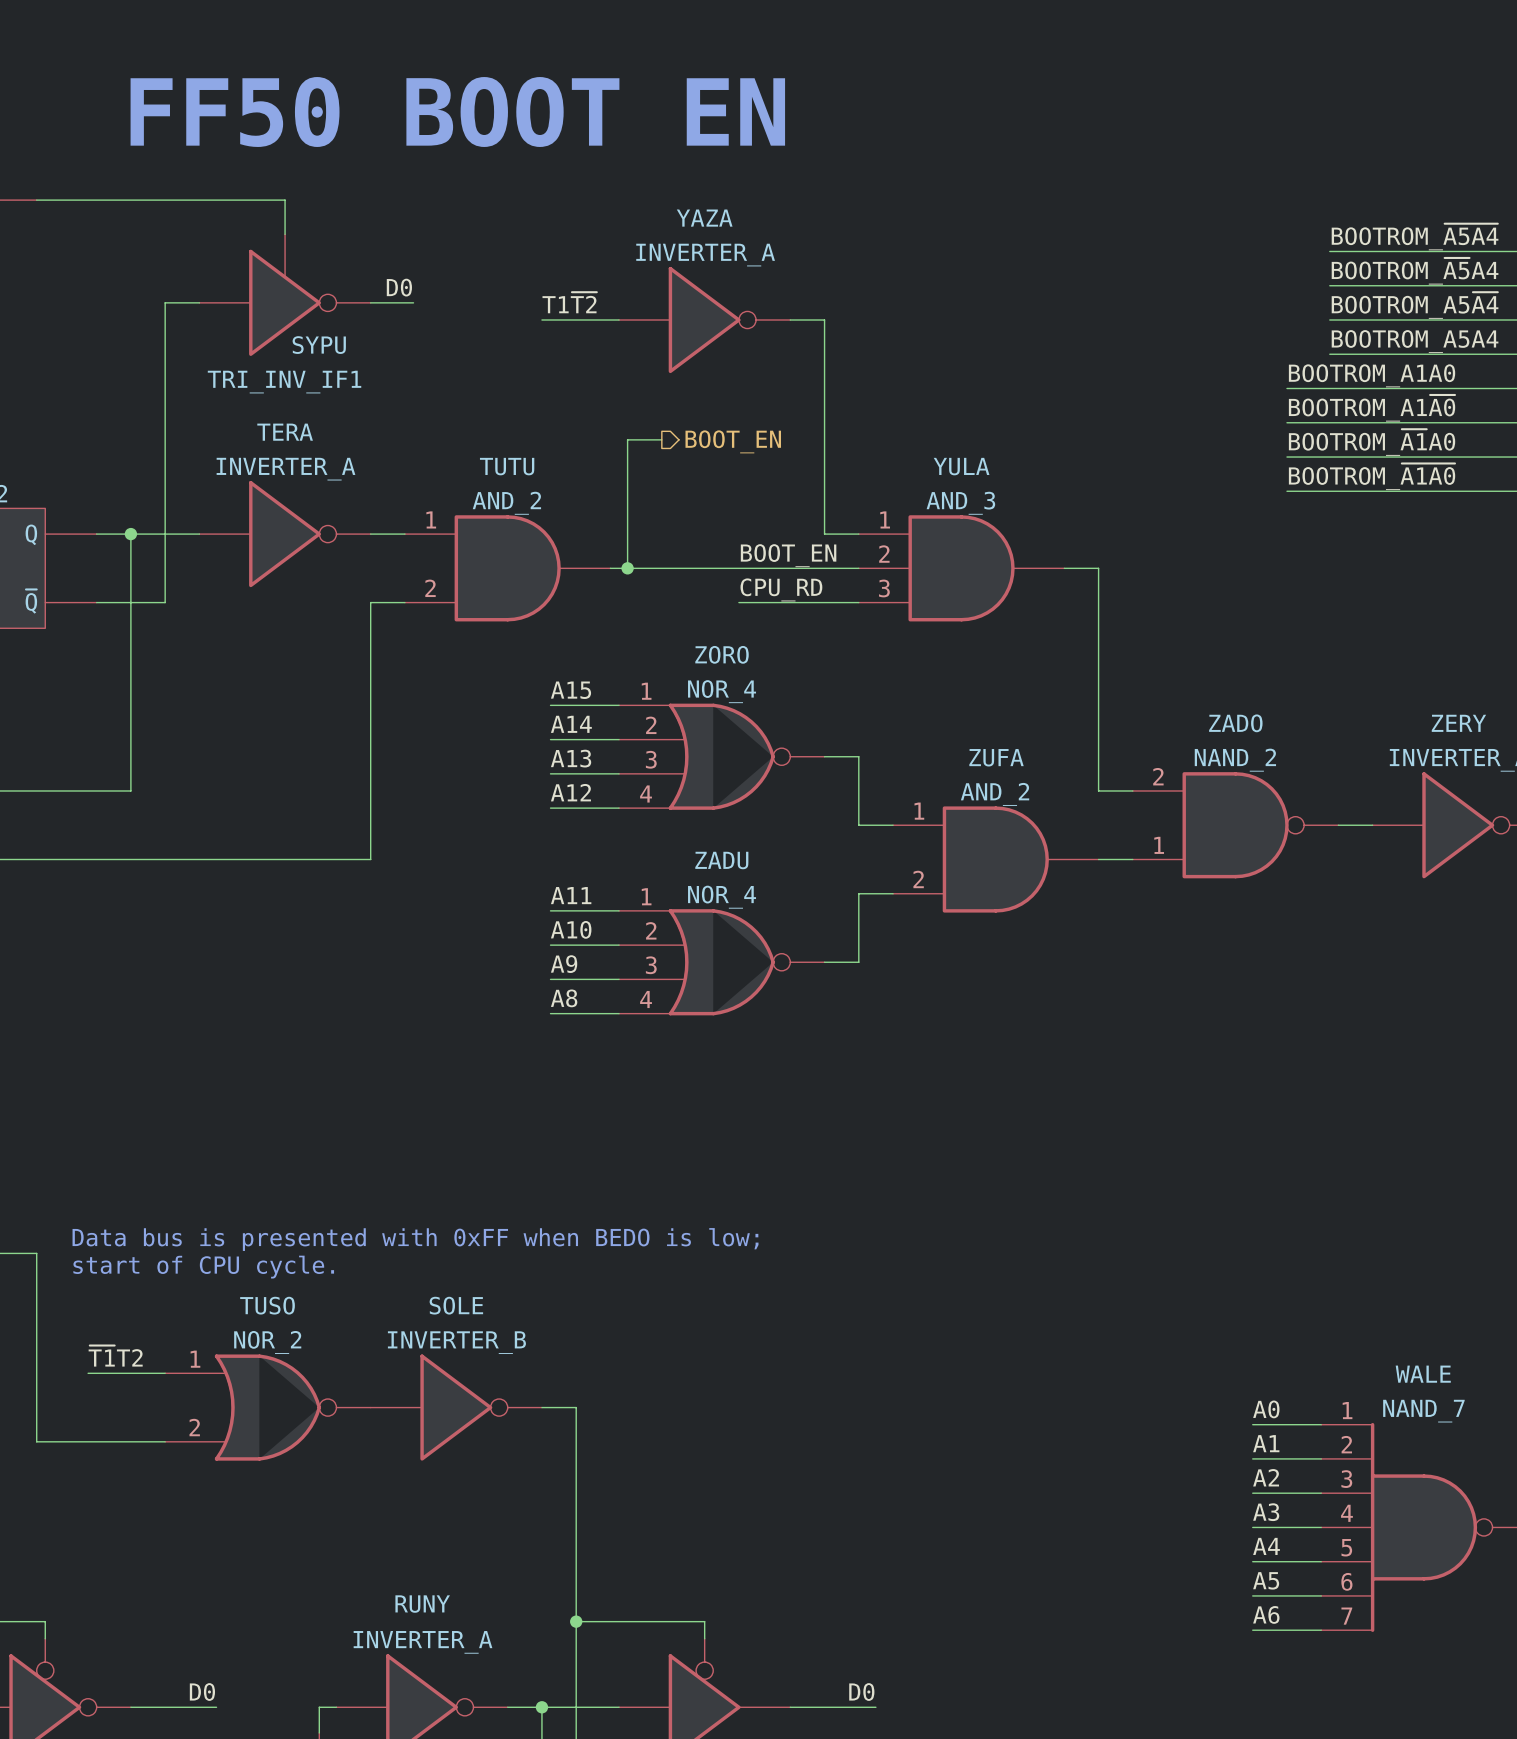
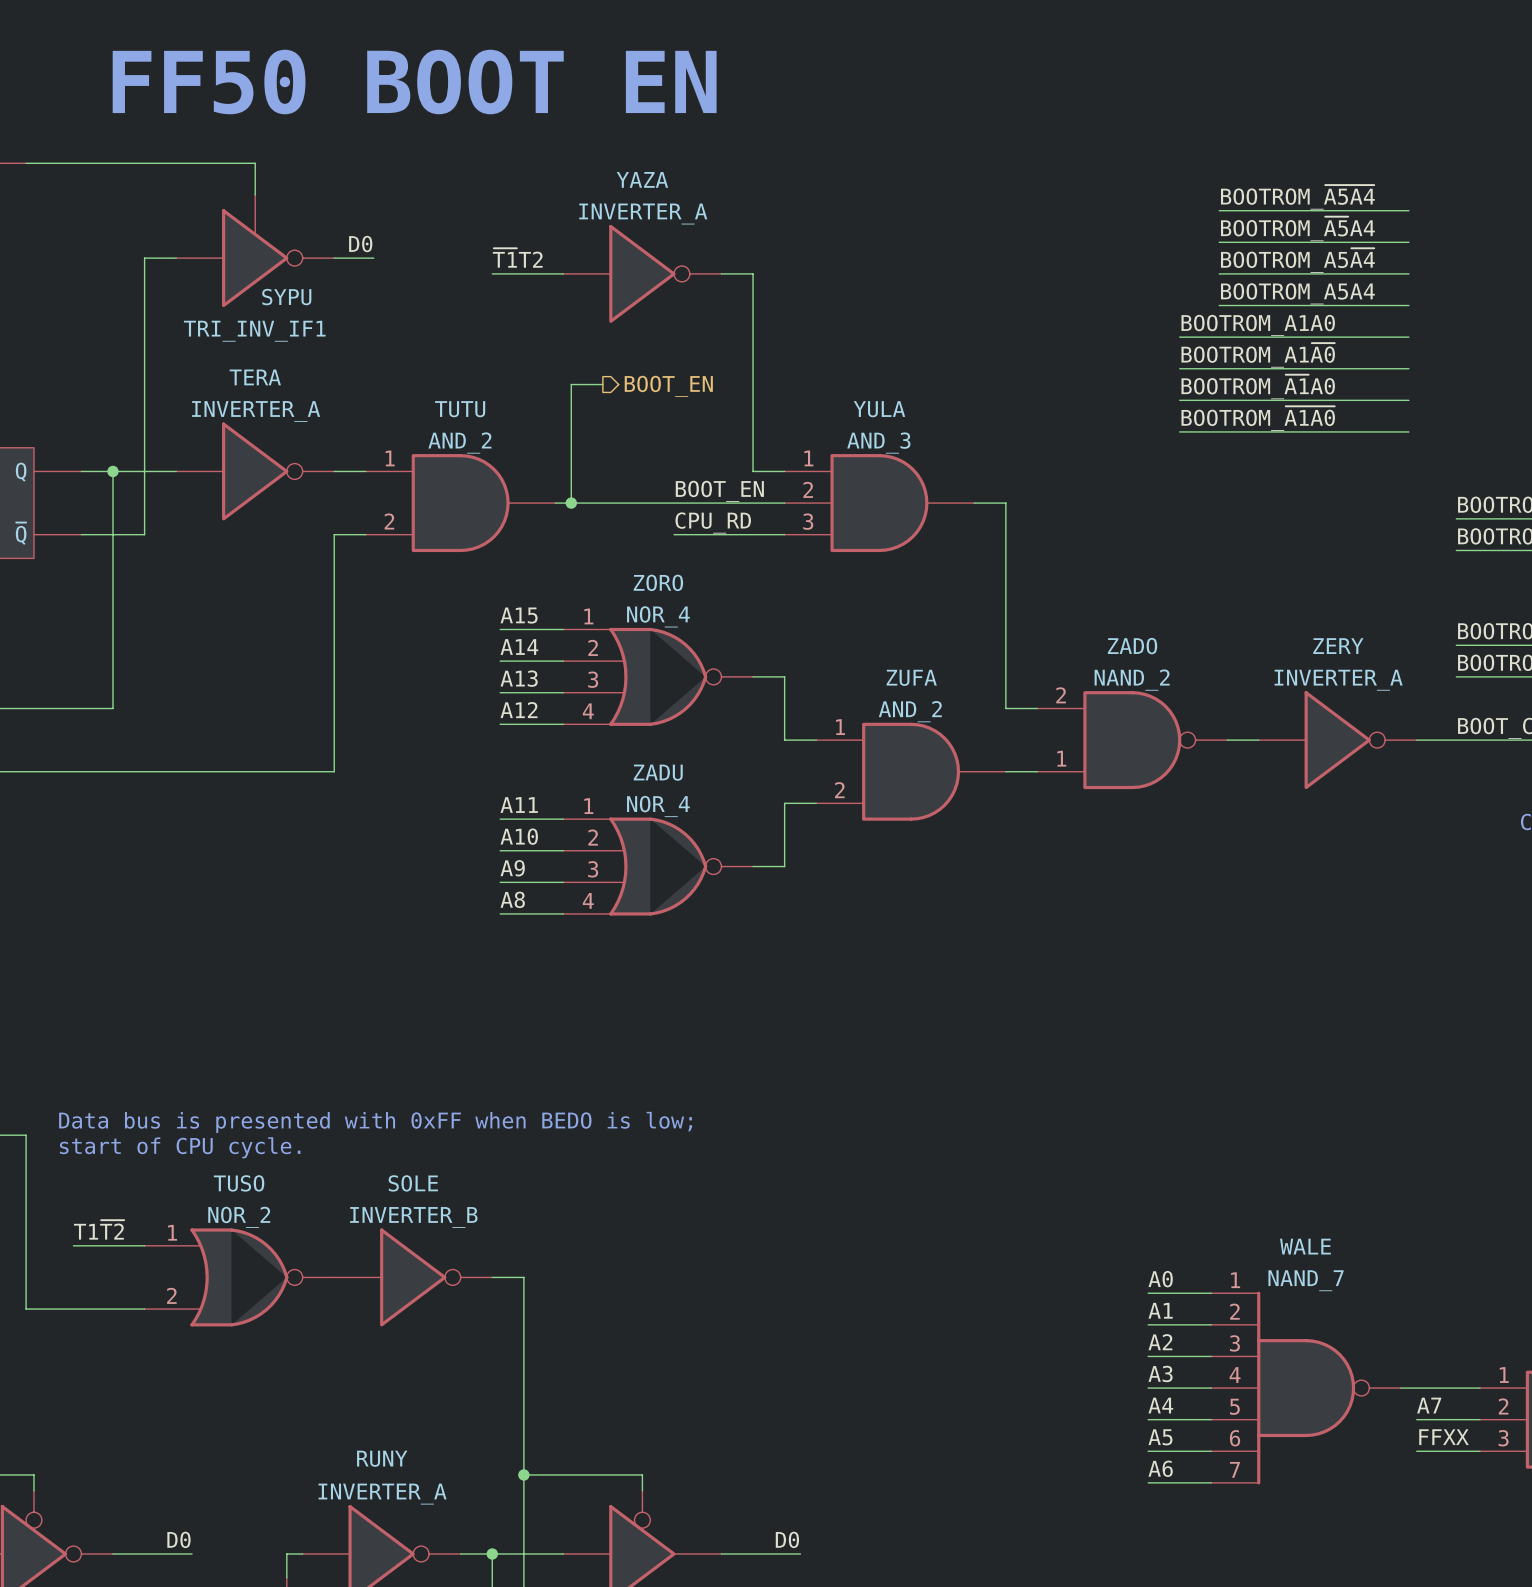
label: T1~{T2} (569, 302) -> ~{T1}T2 (517, 258)
label: ~{T1}T2 (115, 1356) -> T1~{T2} (99, 1229)

